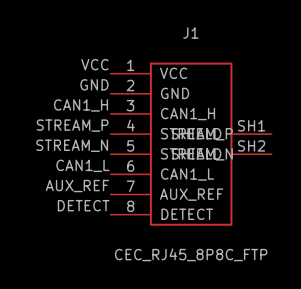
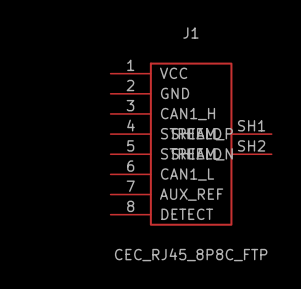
label: VCC (94, 64) -> none
label: GND (94, 84) -> none
label: CAN1_H (81, 105) -> none
label: STREAM_P (72, 125) -> none
label: STREAM_N (72, 145) -> none
label: CAN1_L (82, 165) -> none
label: AUX_REF (77, 186) -> none
label: DETECT (83, 205) -> none

